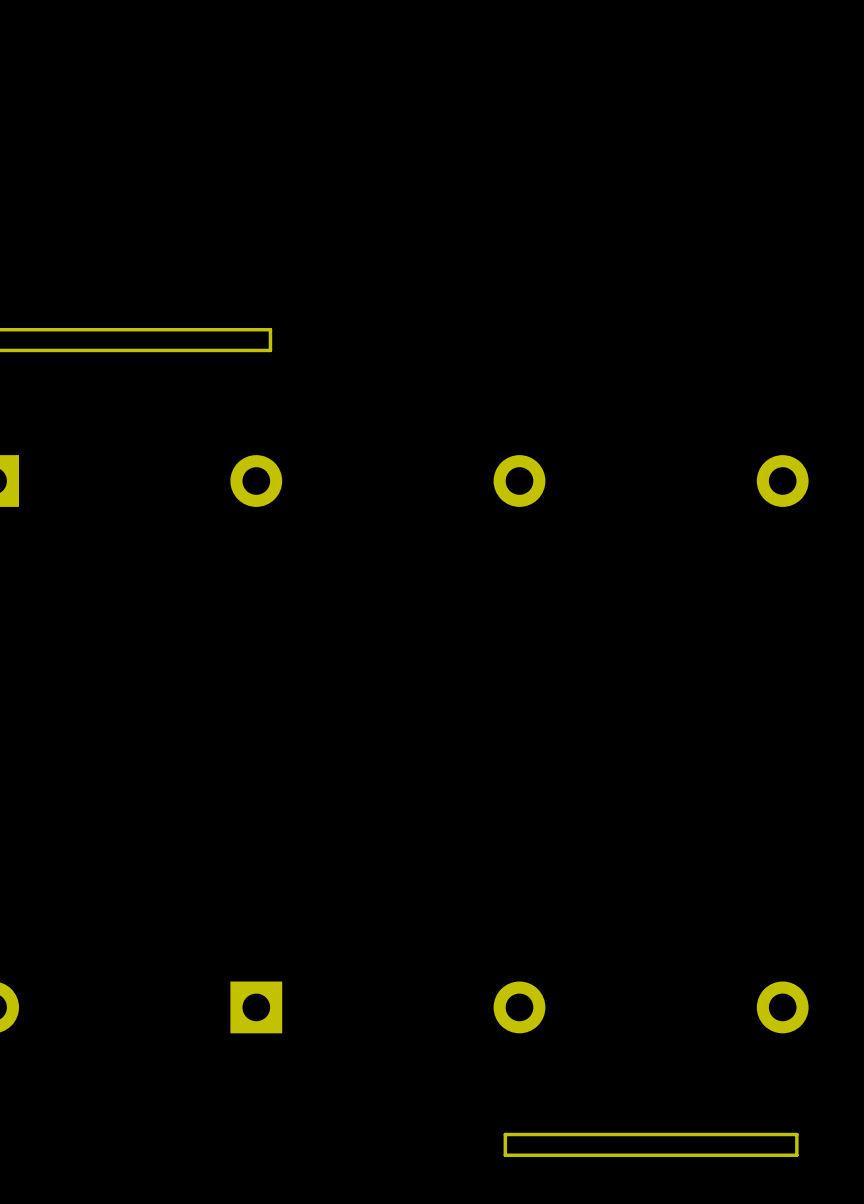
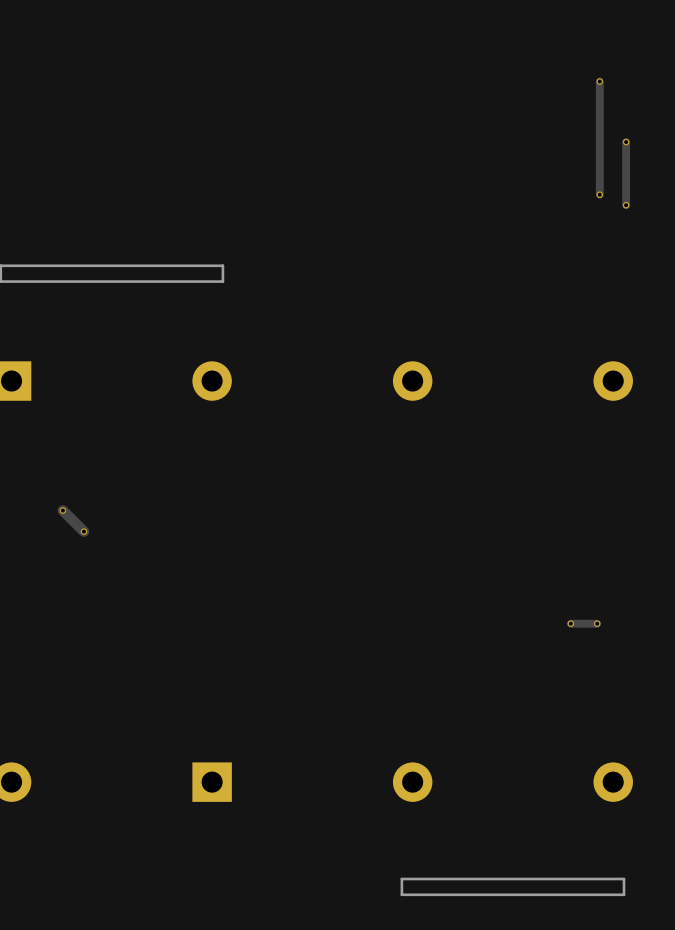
track: none -> (599, 81) (599, 194)
via: none -> (599, 81)
track: none -> (626, 142) (626, 205)
via: none -> (626, 142)
via: none -> (599, 194)
via: none -> (626, 205)
track: none -> (62, 510) (83, 531)
via: none -> (62, 510)
via: none -> (83, 531)
via: none -> (570, 623)
track: none -> (597, 623) (570, 623)
via: none -> (597, 623)

